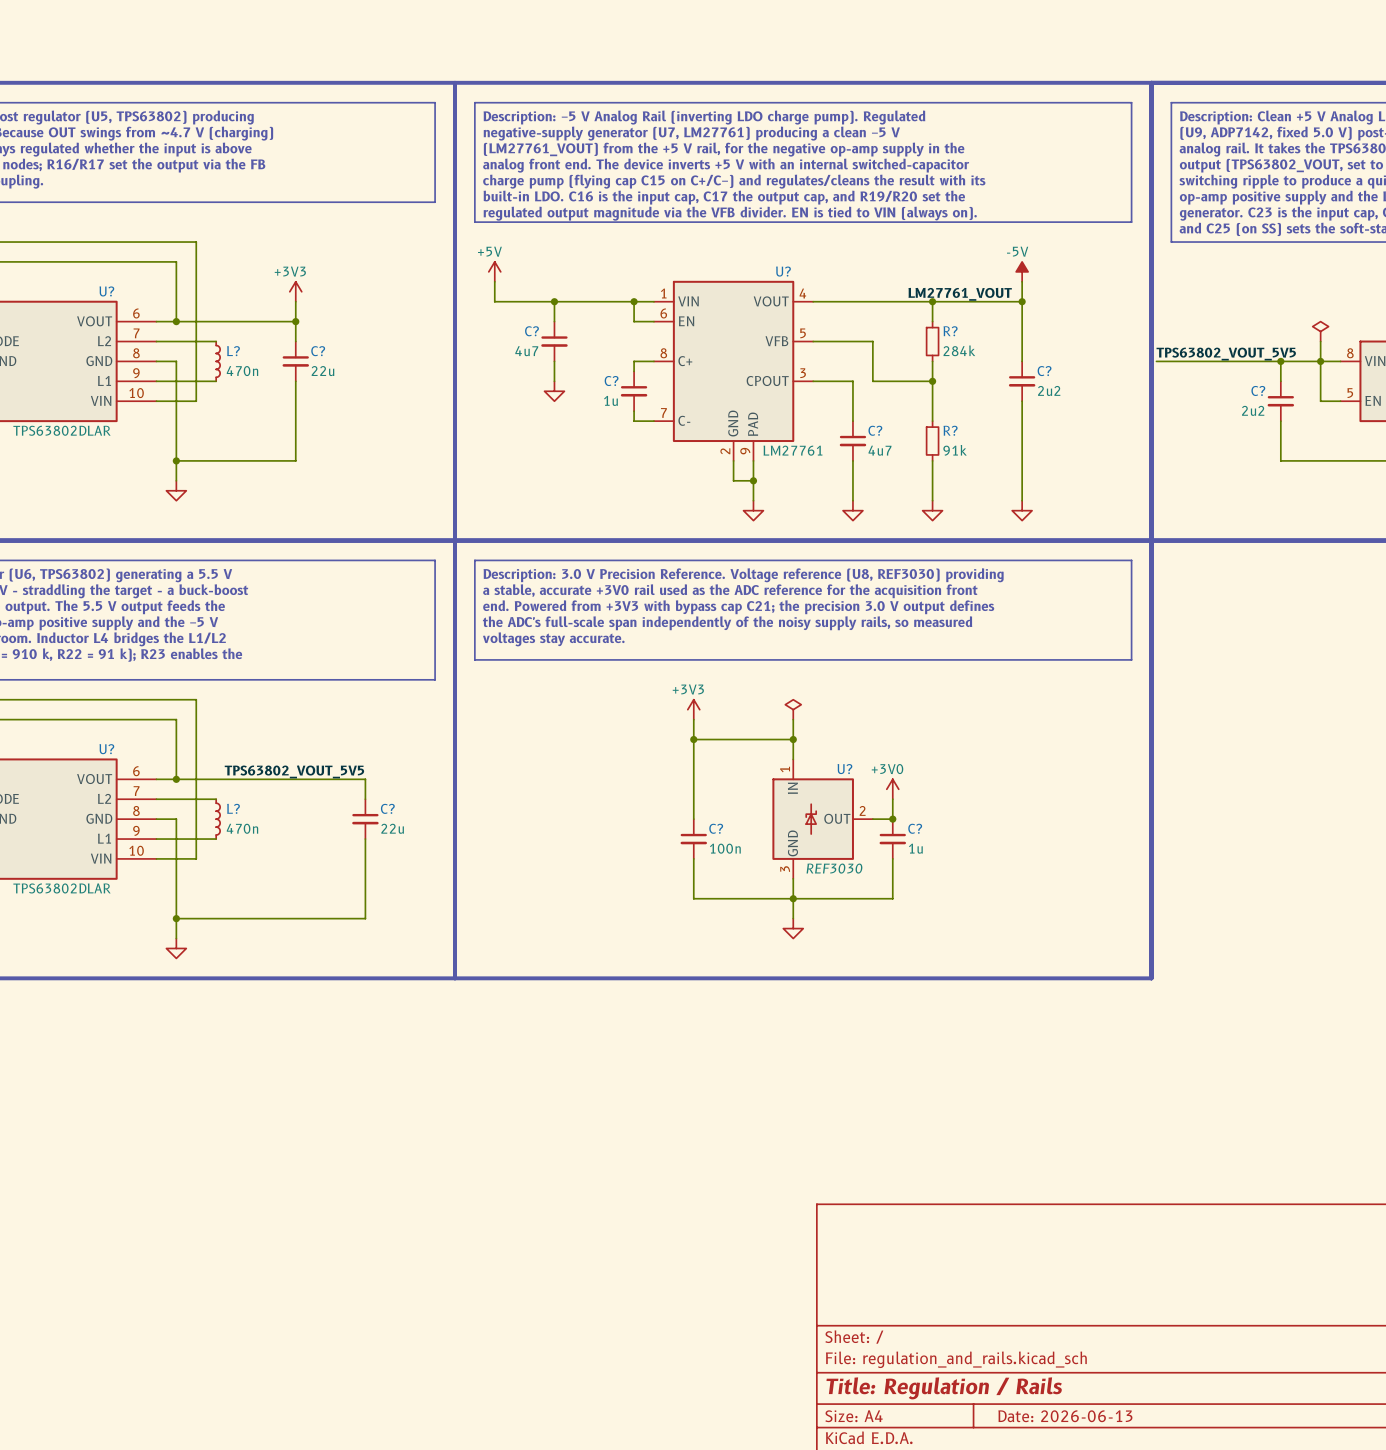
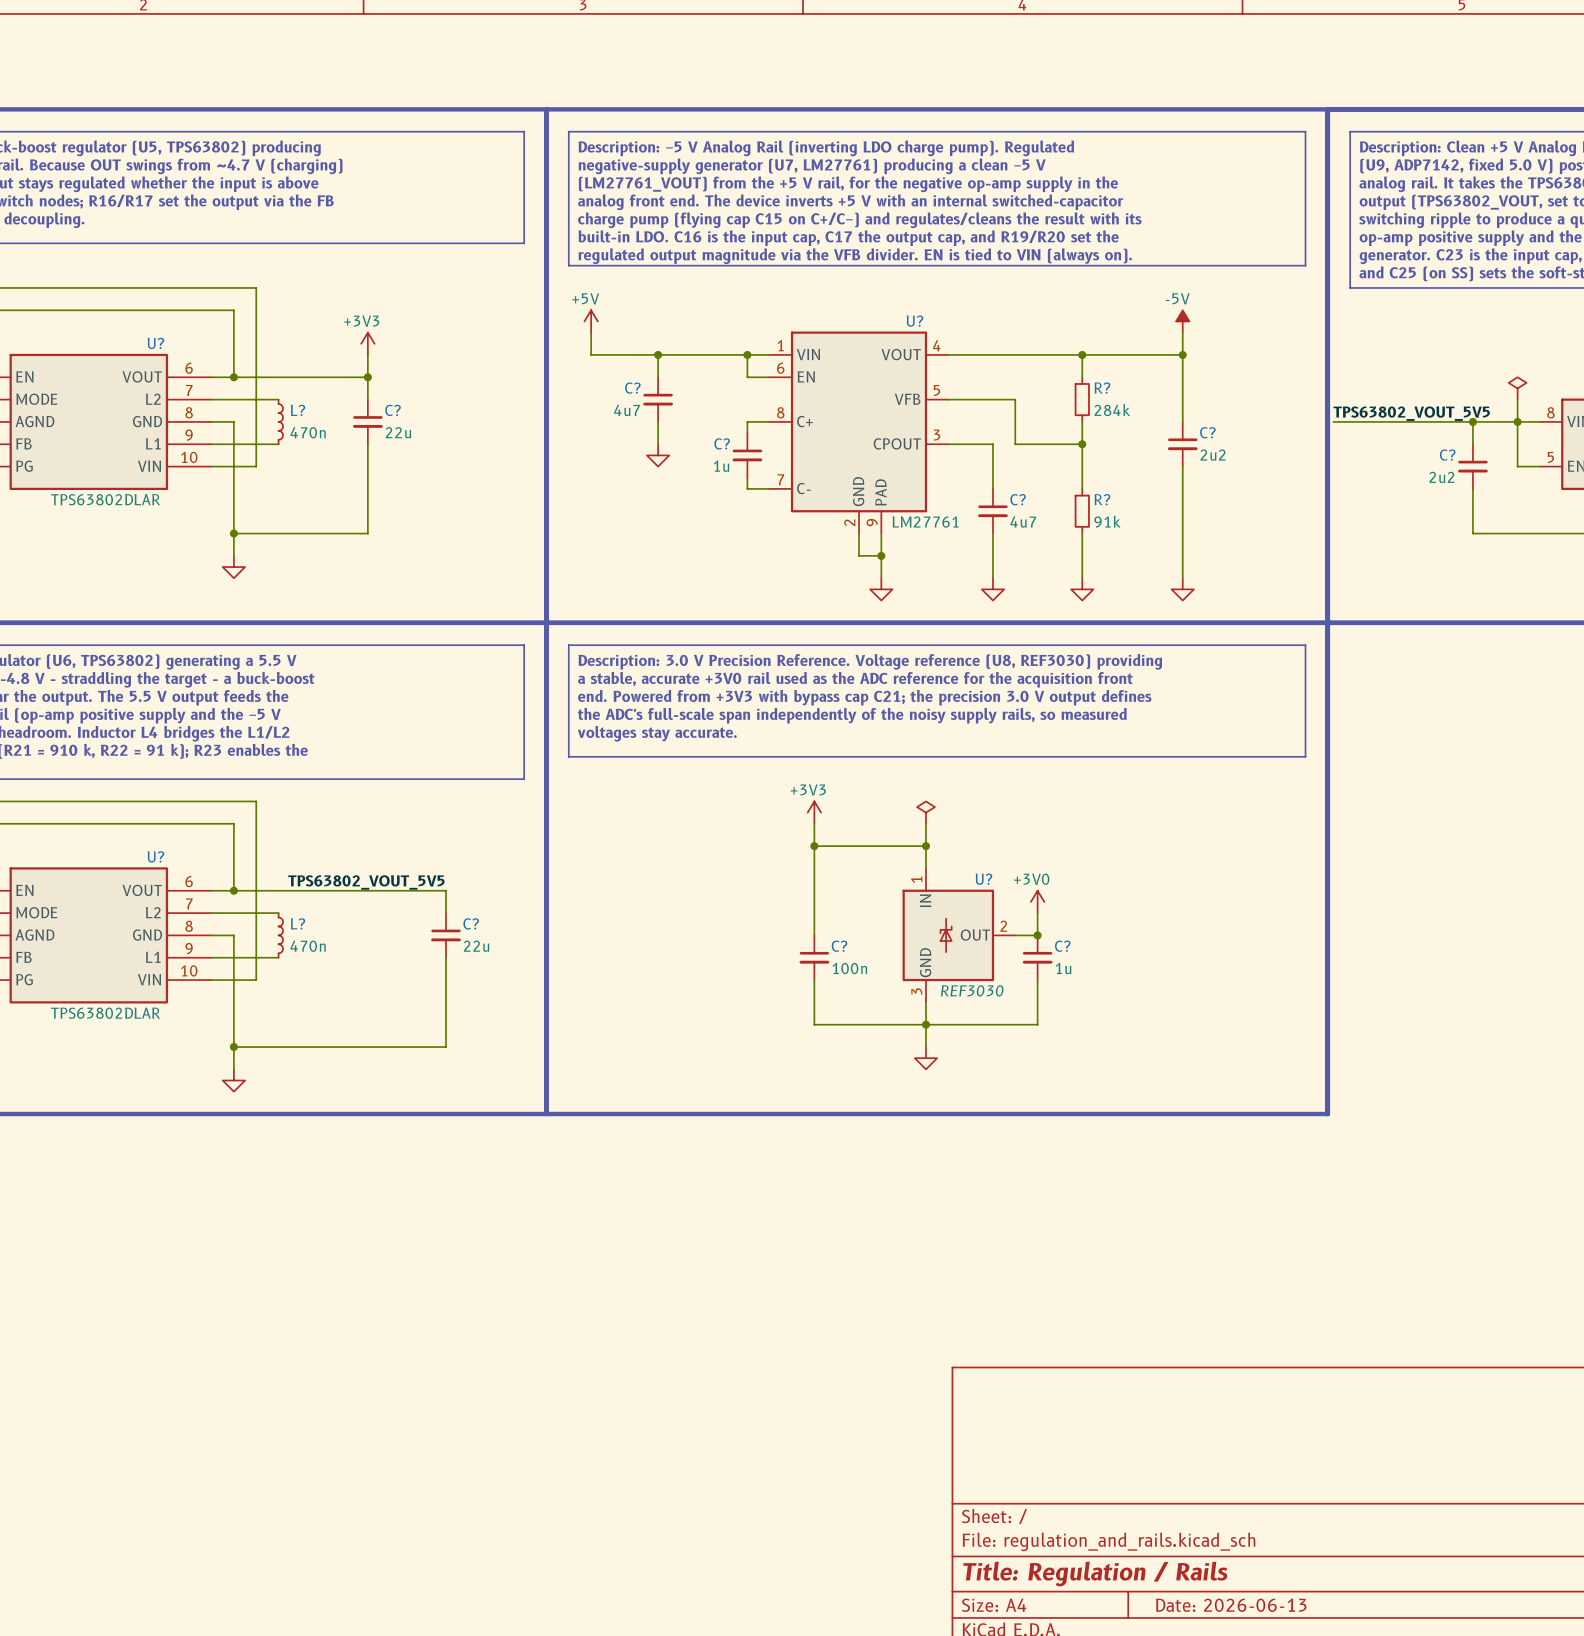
label: LM27761_VOUT (960, 294) -> none

